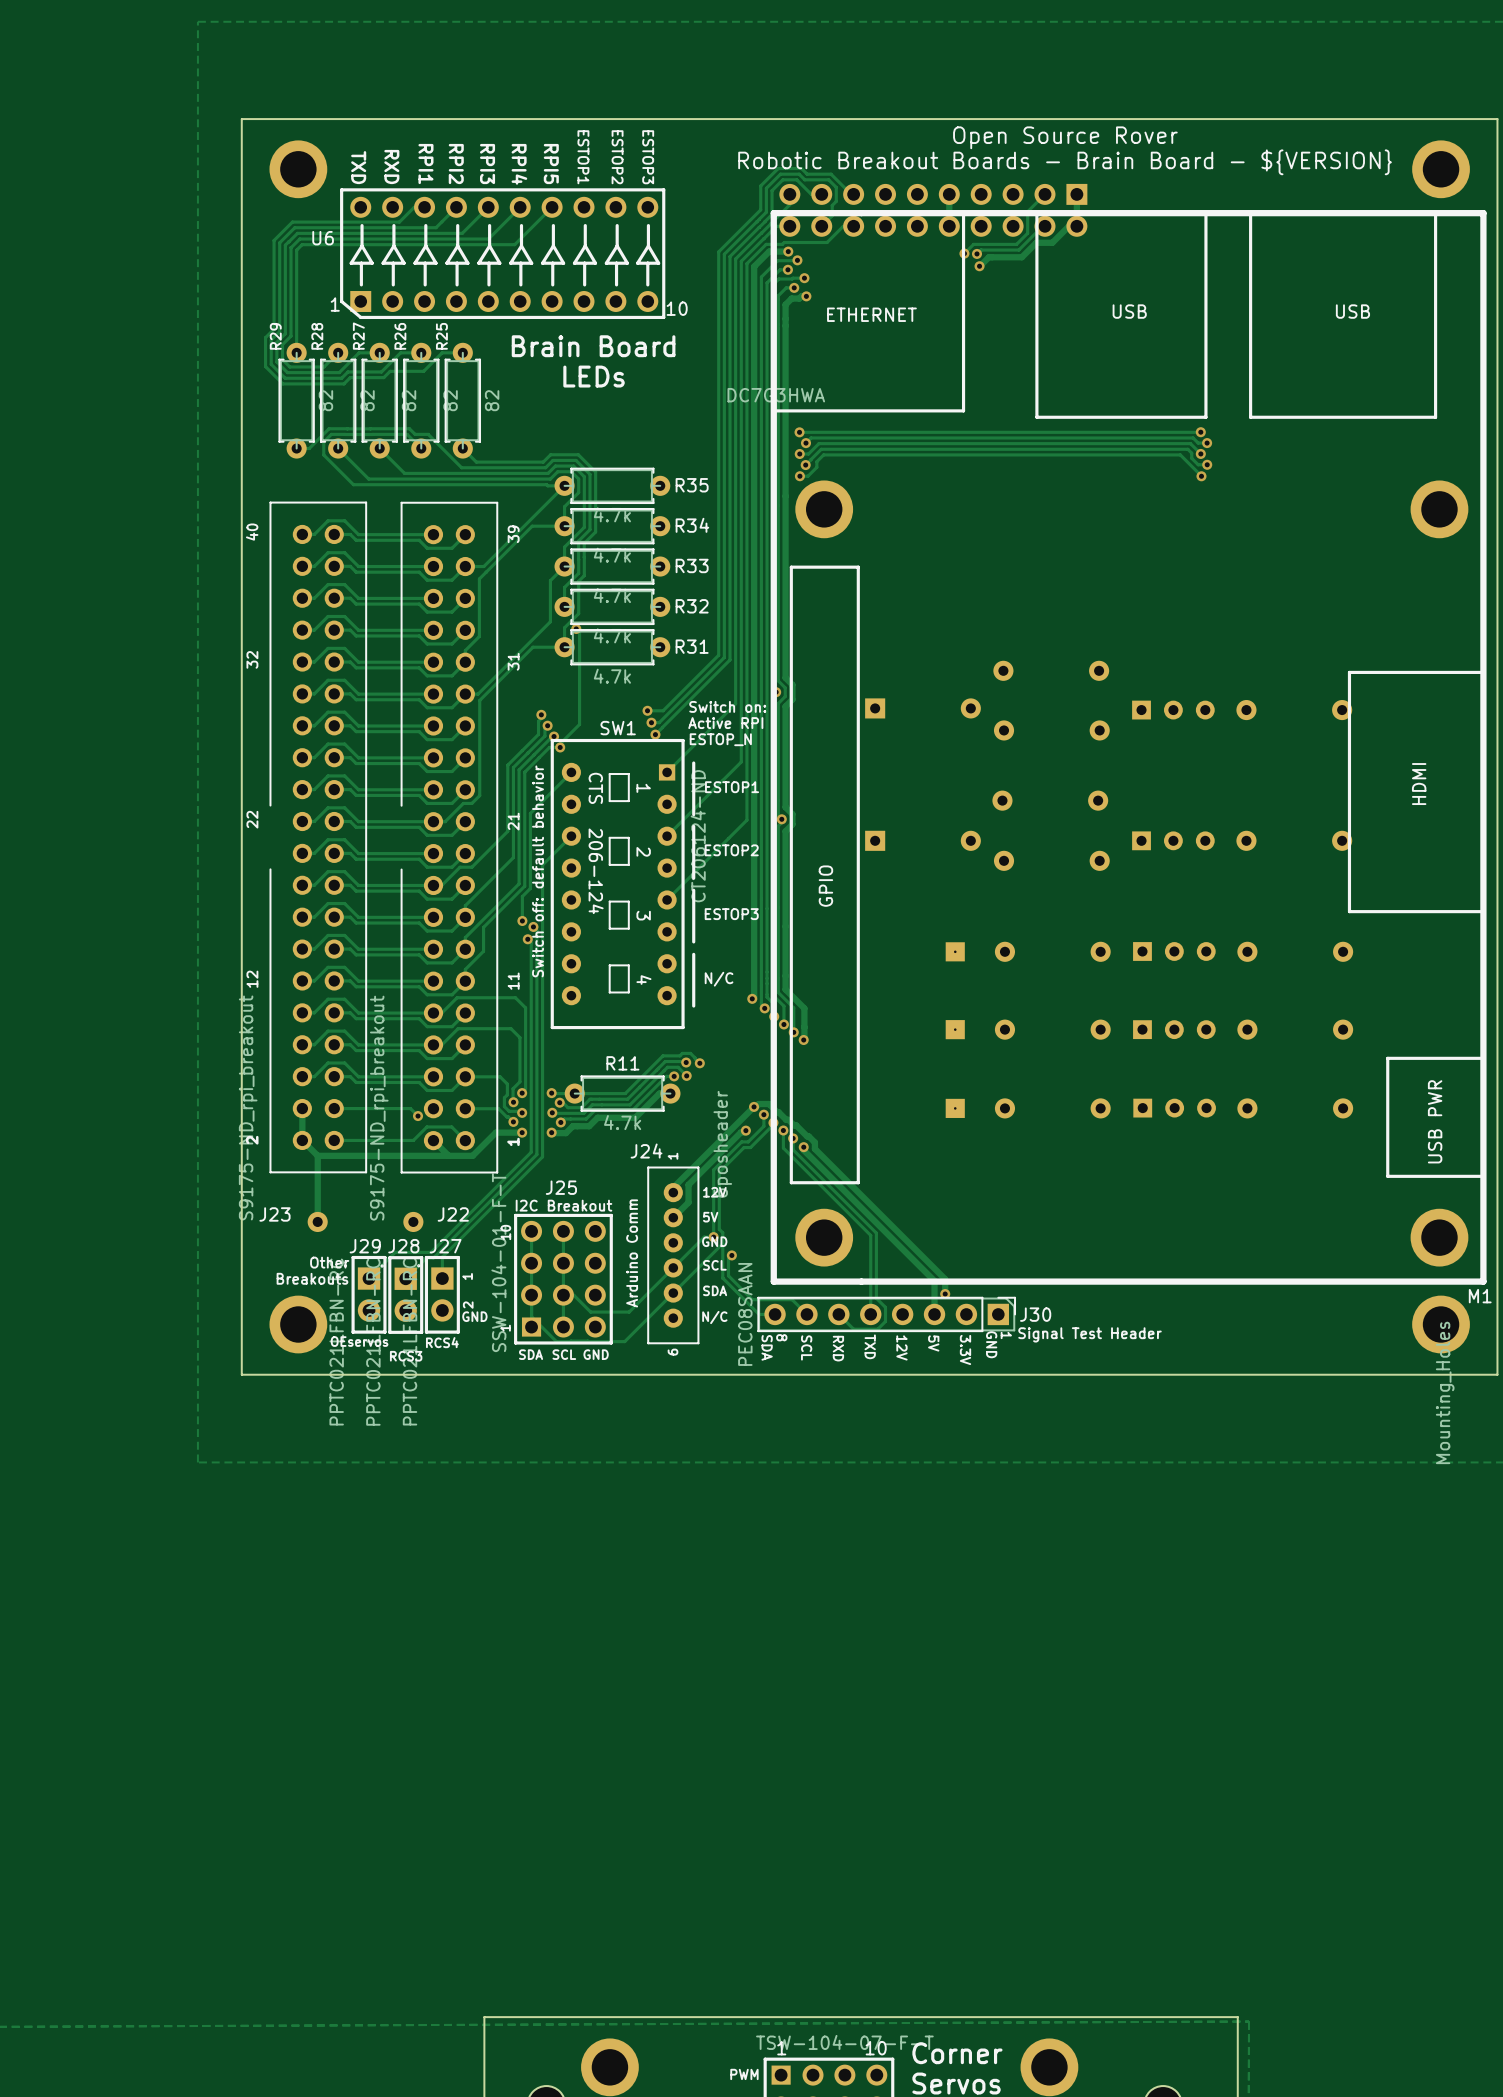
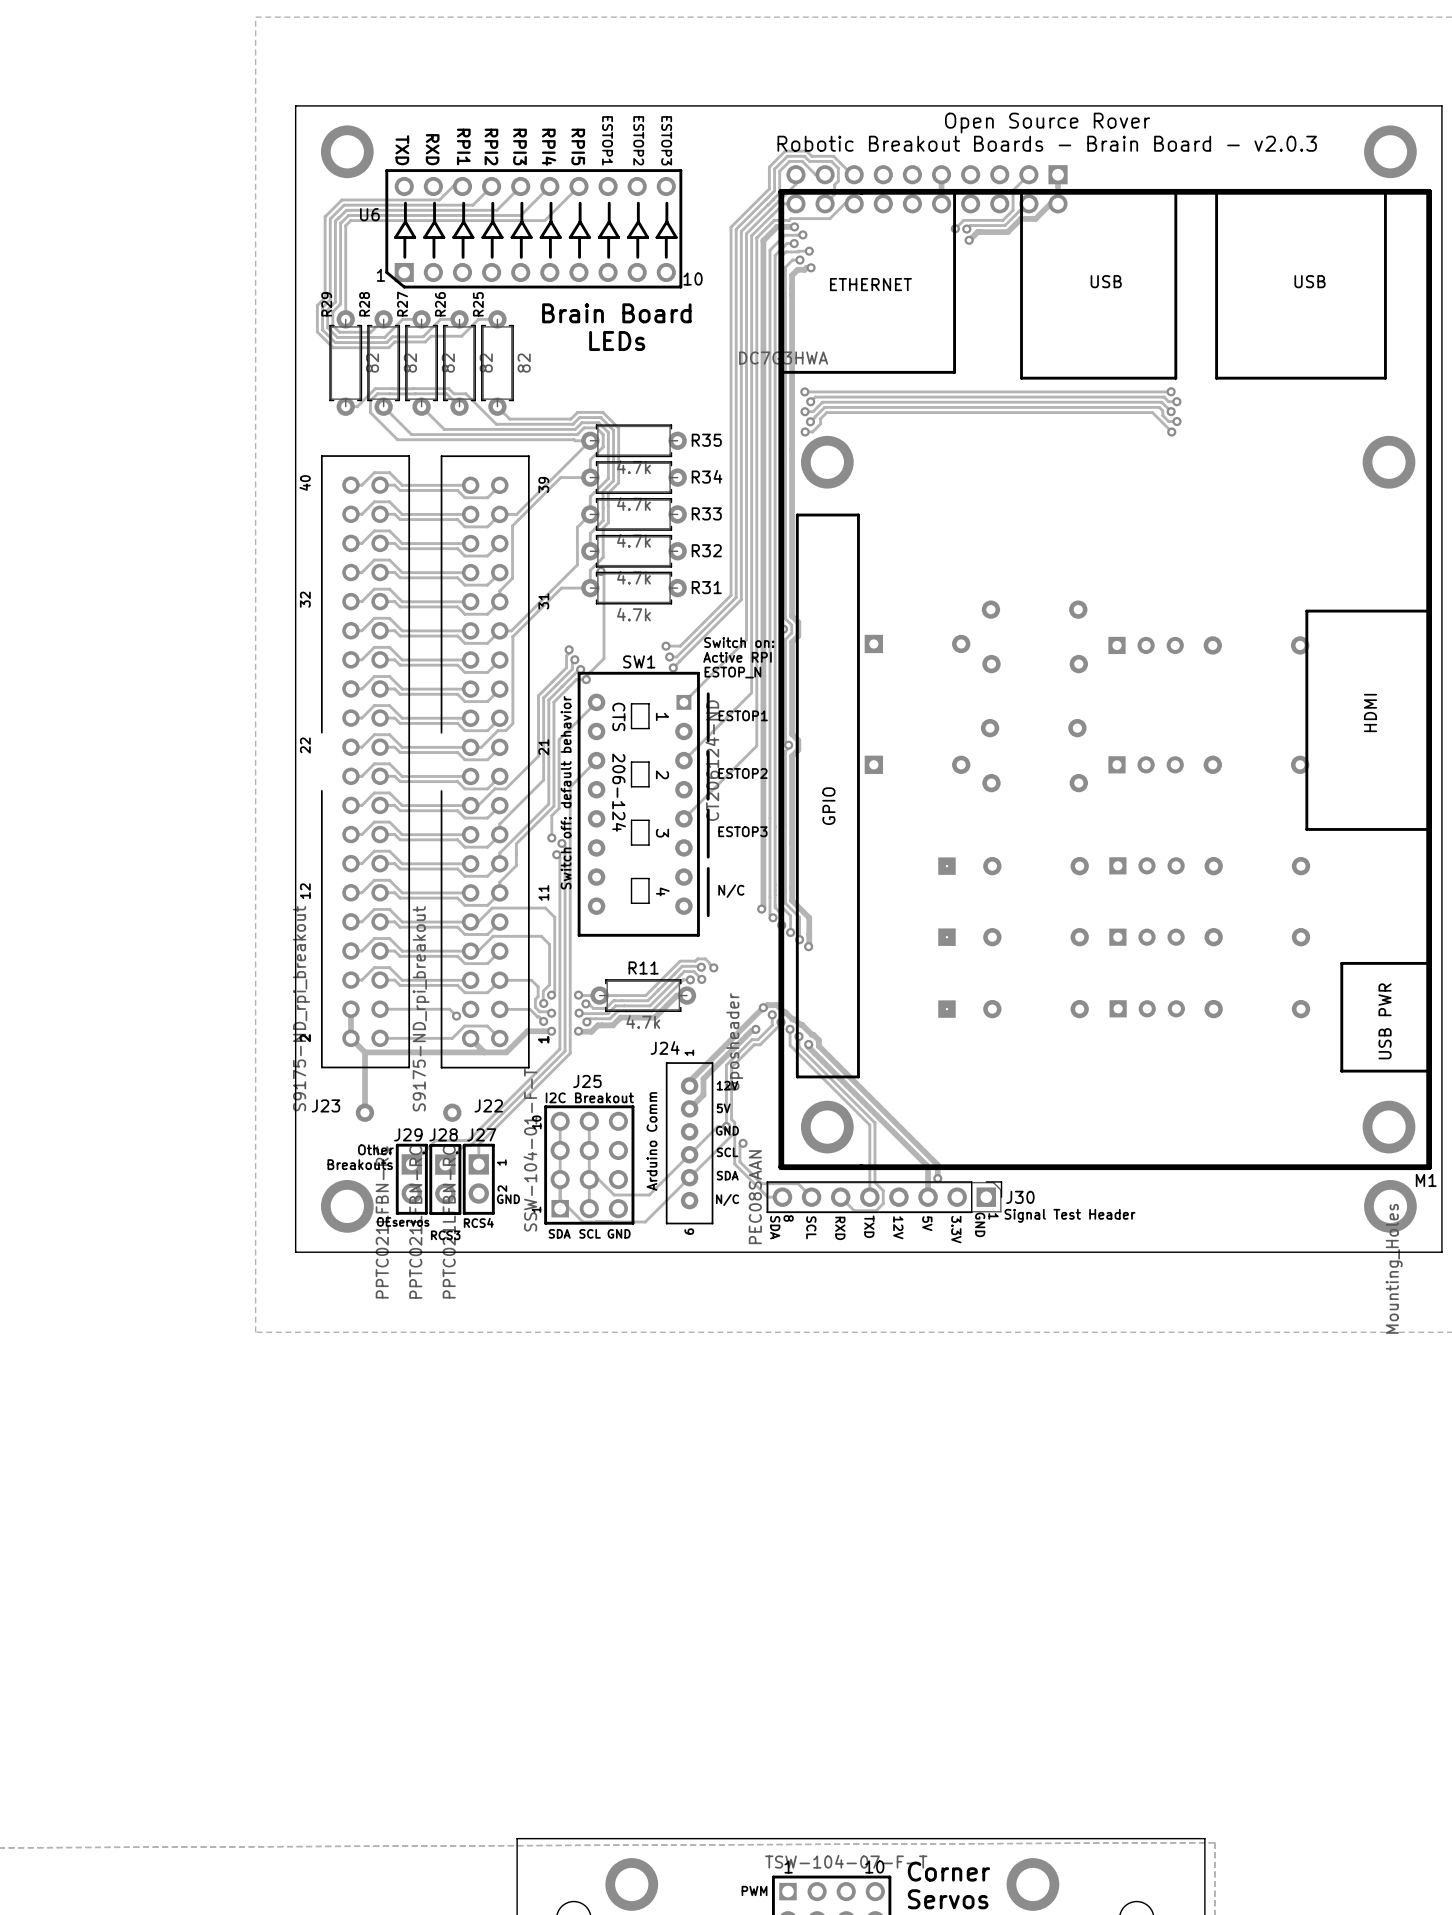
text: Robotic Breakout Boards - Brain Board - ${VERSION} (1065, 162) -> Robotic Breakout Boards - Brain Board - v2.0.3 (1047, 143)

